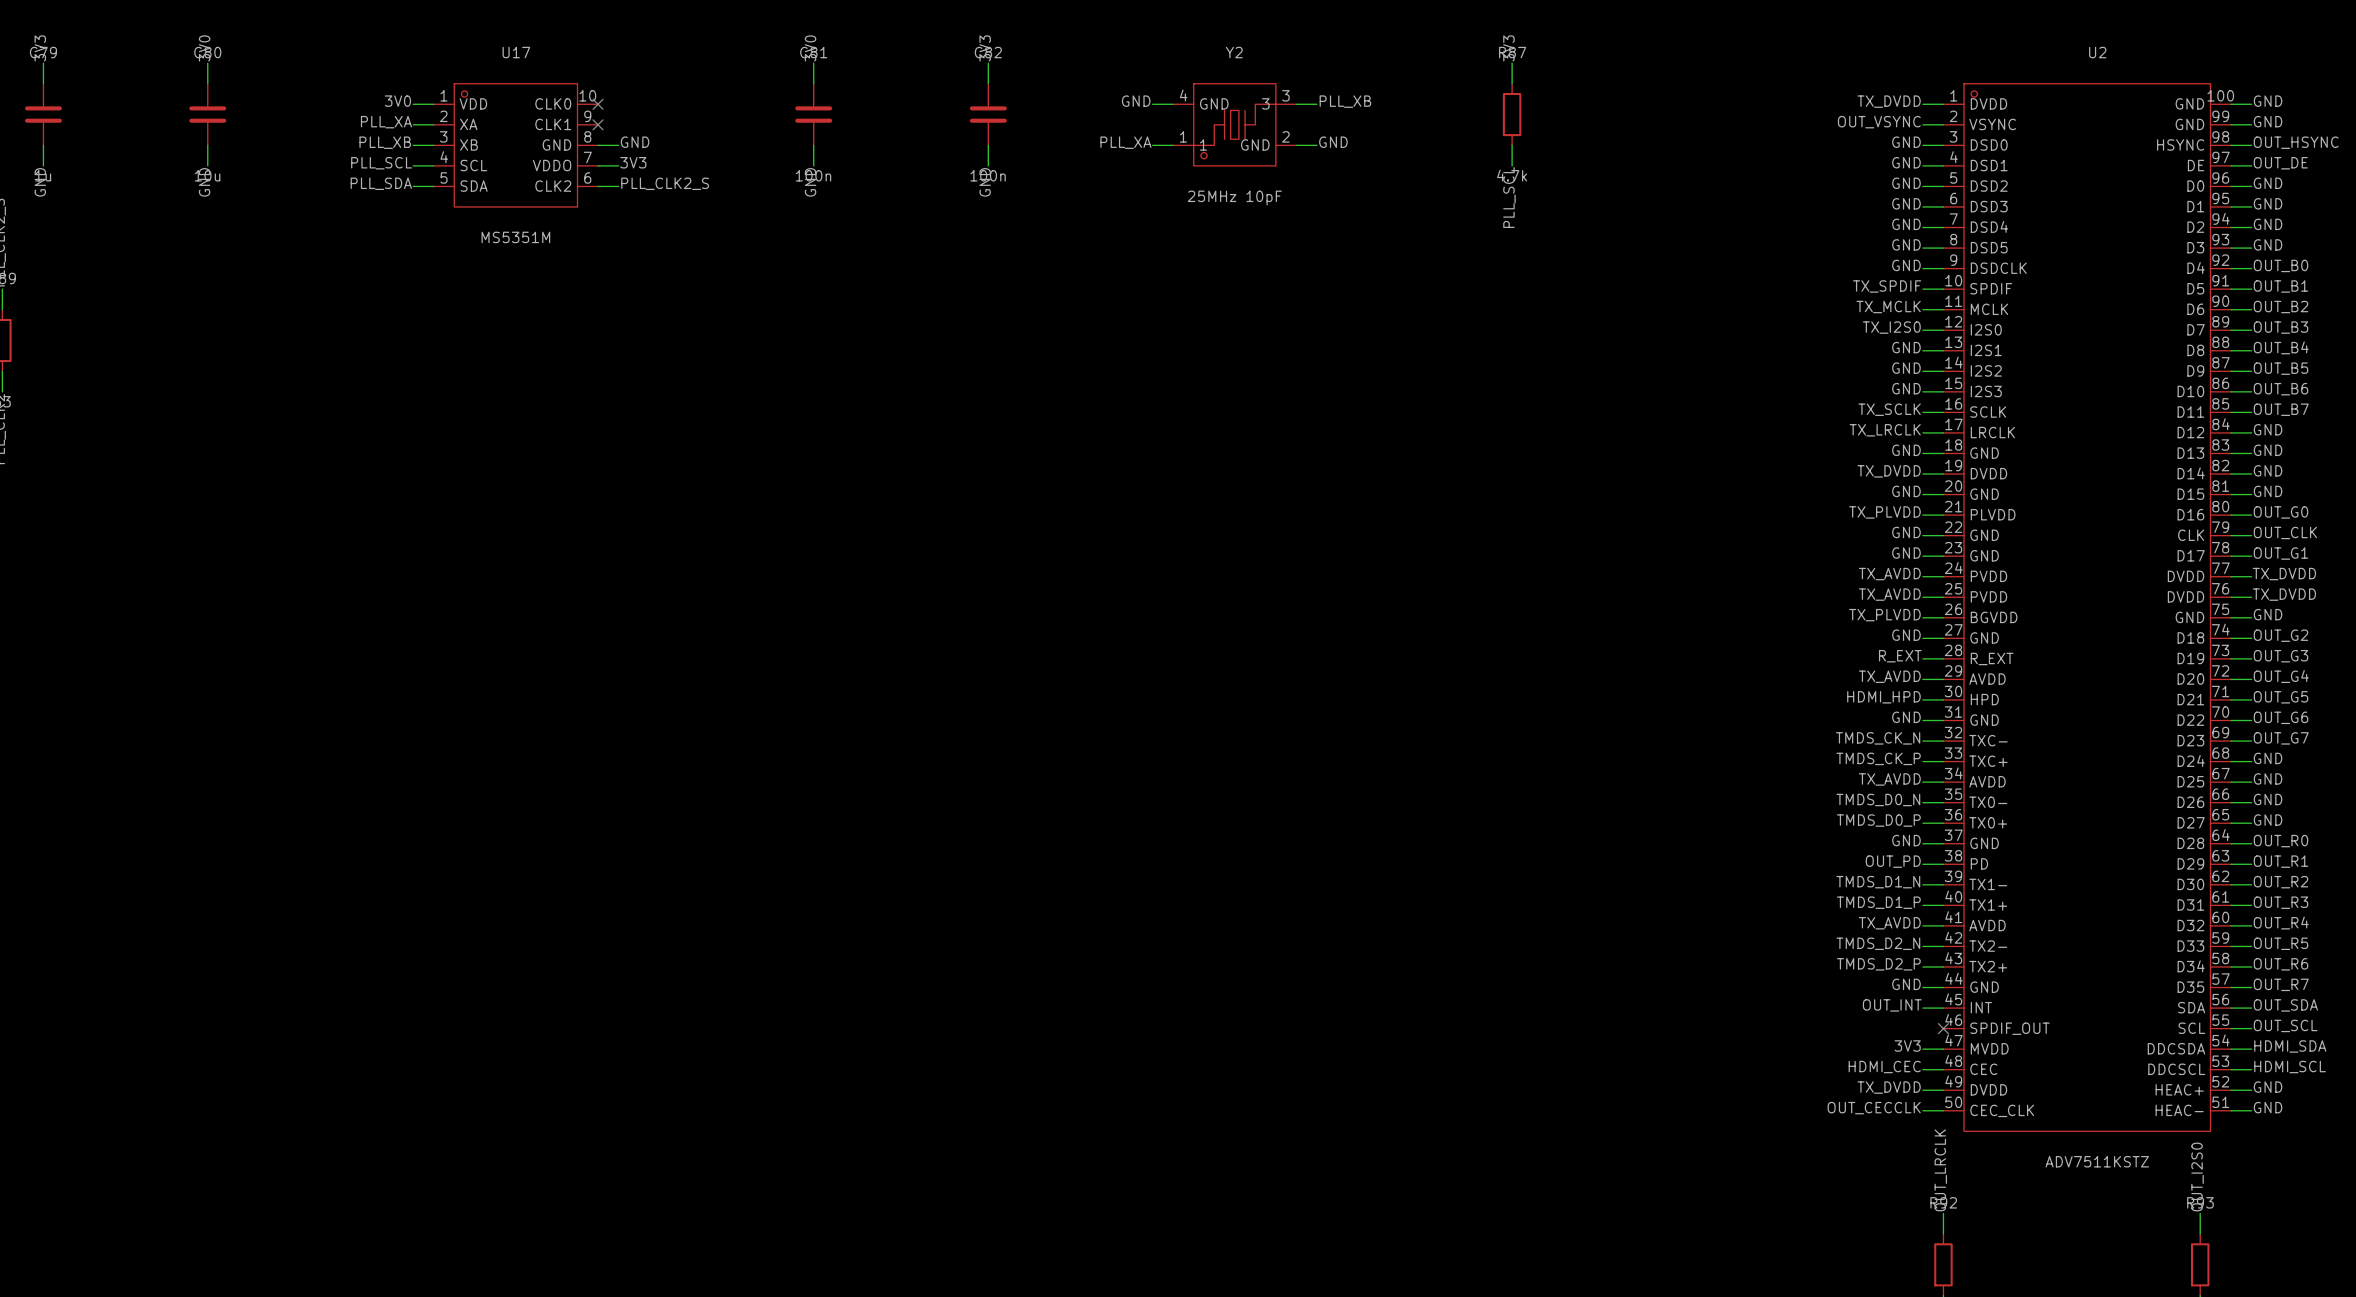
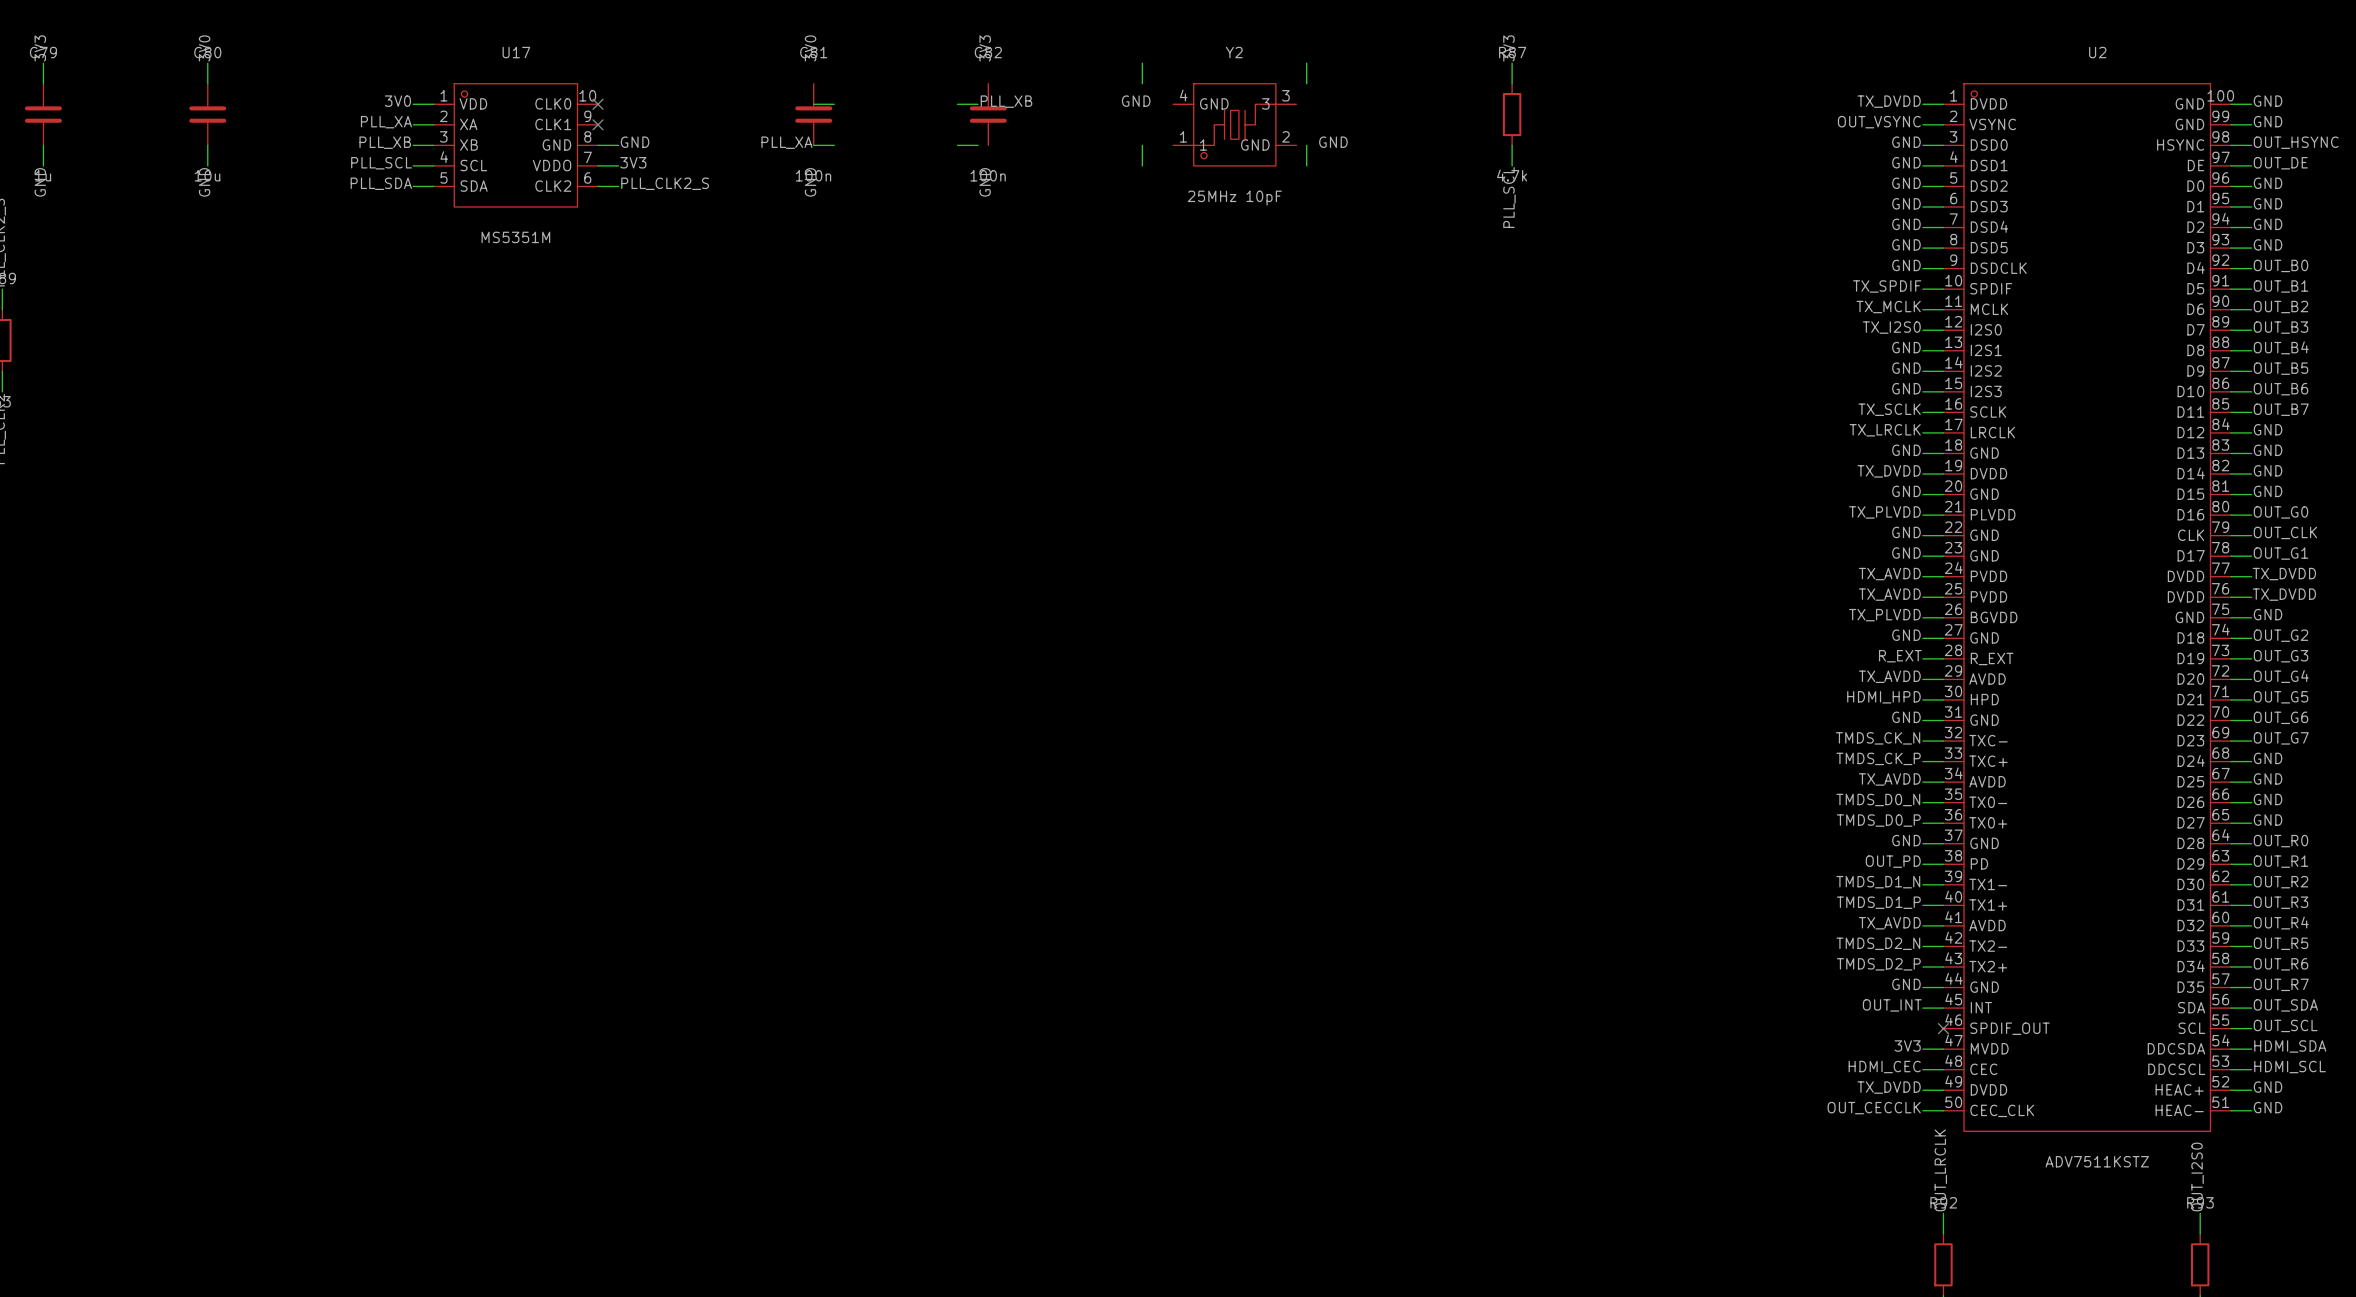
wire: (813, 63) (813, 83) -> none
wire: (988, 63) (988, 83) -> (1142, 63) (1142, 83)
wire: none -> (1306, 63) (1306, 83)
label: none -> PLL_XB (1006, 101)
label: PLL_XB (1345, 101) -> none
wire: none -> (813, 104) (834, 104)
wire: (1152, 104) (1173, 104) -> (957, 104) (978, 104)
wire: (1296, 104) (1316, 104) -> none
label: none -> PLL_XA (786, 142)
label: PLL_XA (1125, 142) -> none
wire: (813, 145) (813, 165) -> (813, 145) (834, 145)
wire: (988, 145) (988, 165) -> (1142, 145) (1142, 165)
wire: (1152, 145) (1173, 145) -> (957, 145) (978, 145)
wire: (1296, 145) (1316, 145) -> none
wire: none -> (1306, 145) (1306, 165)

